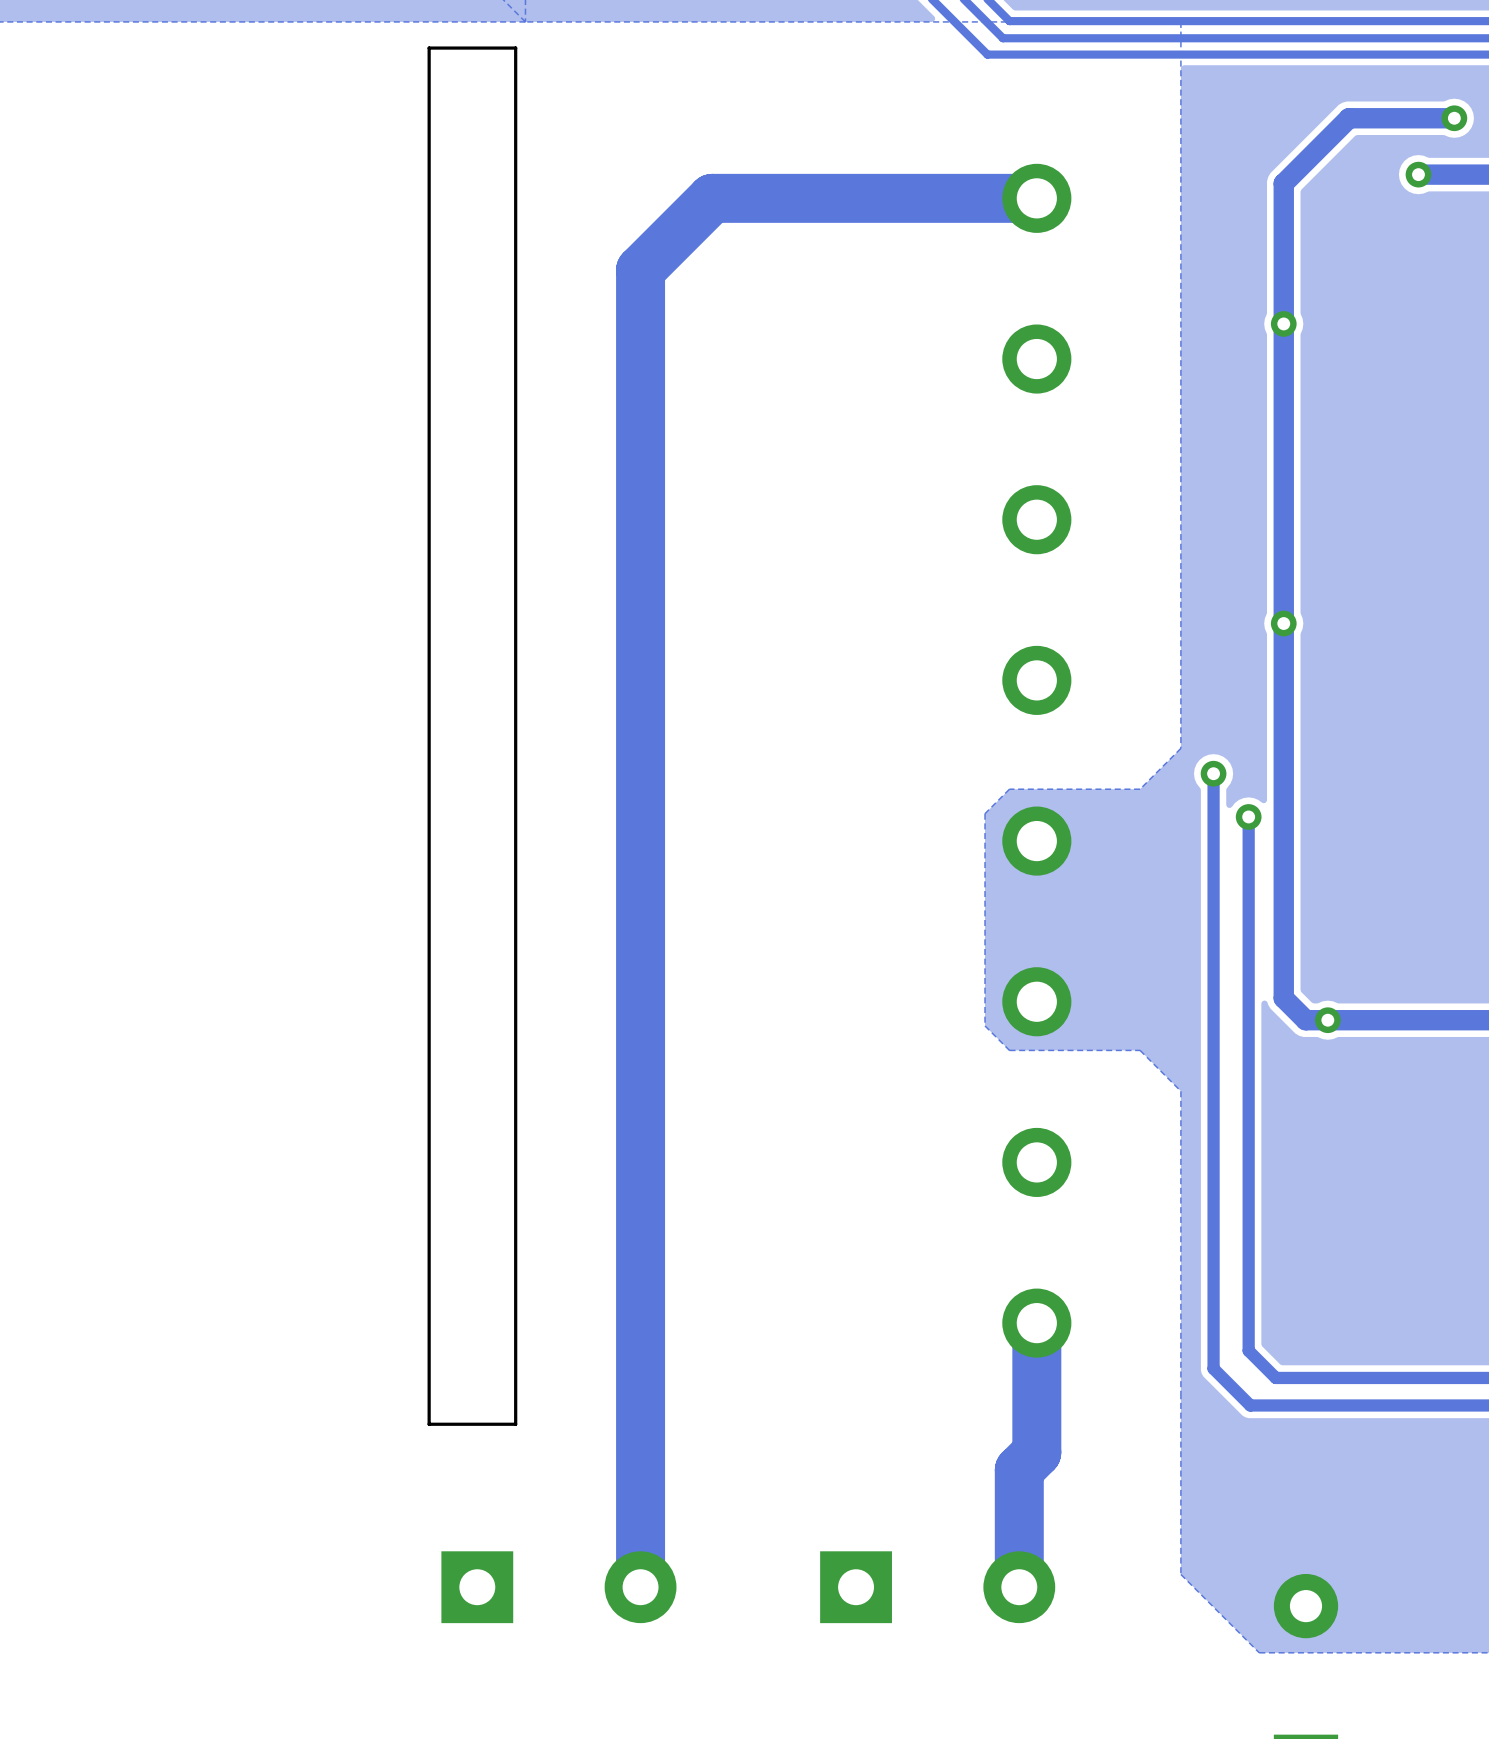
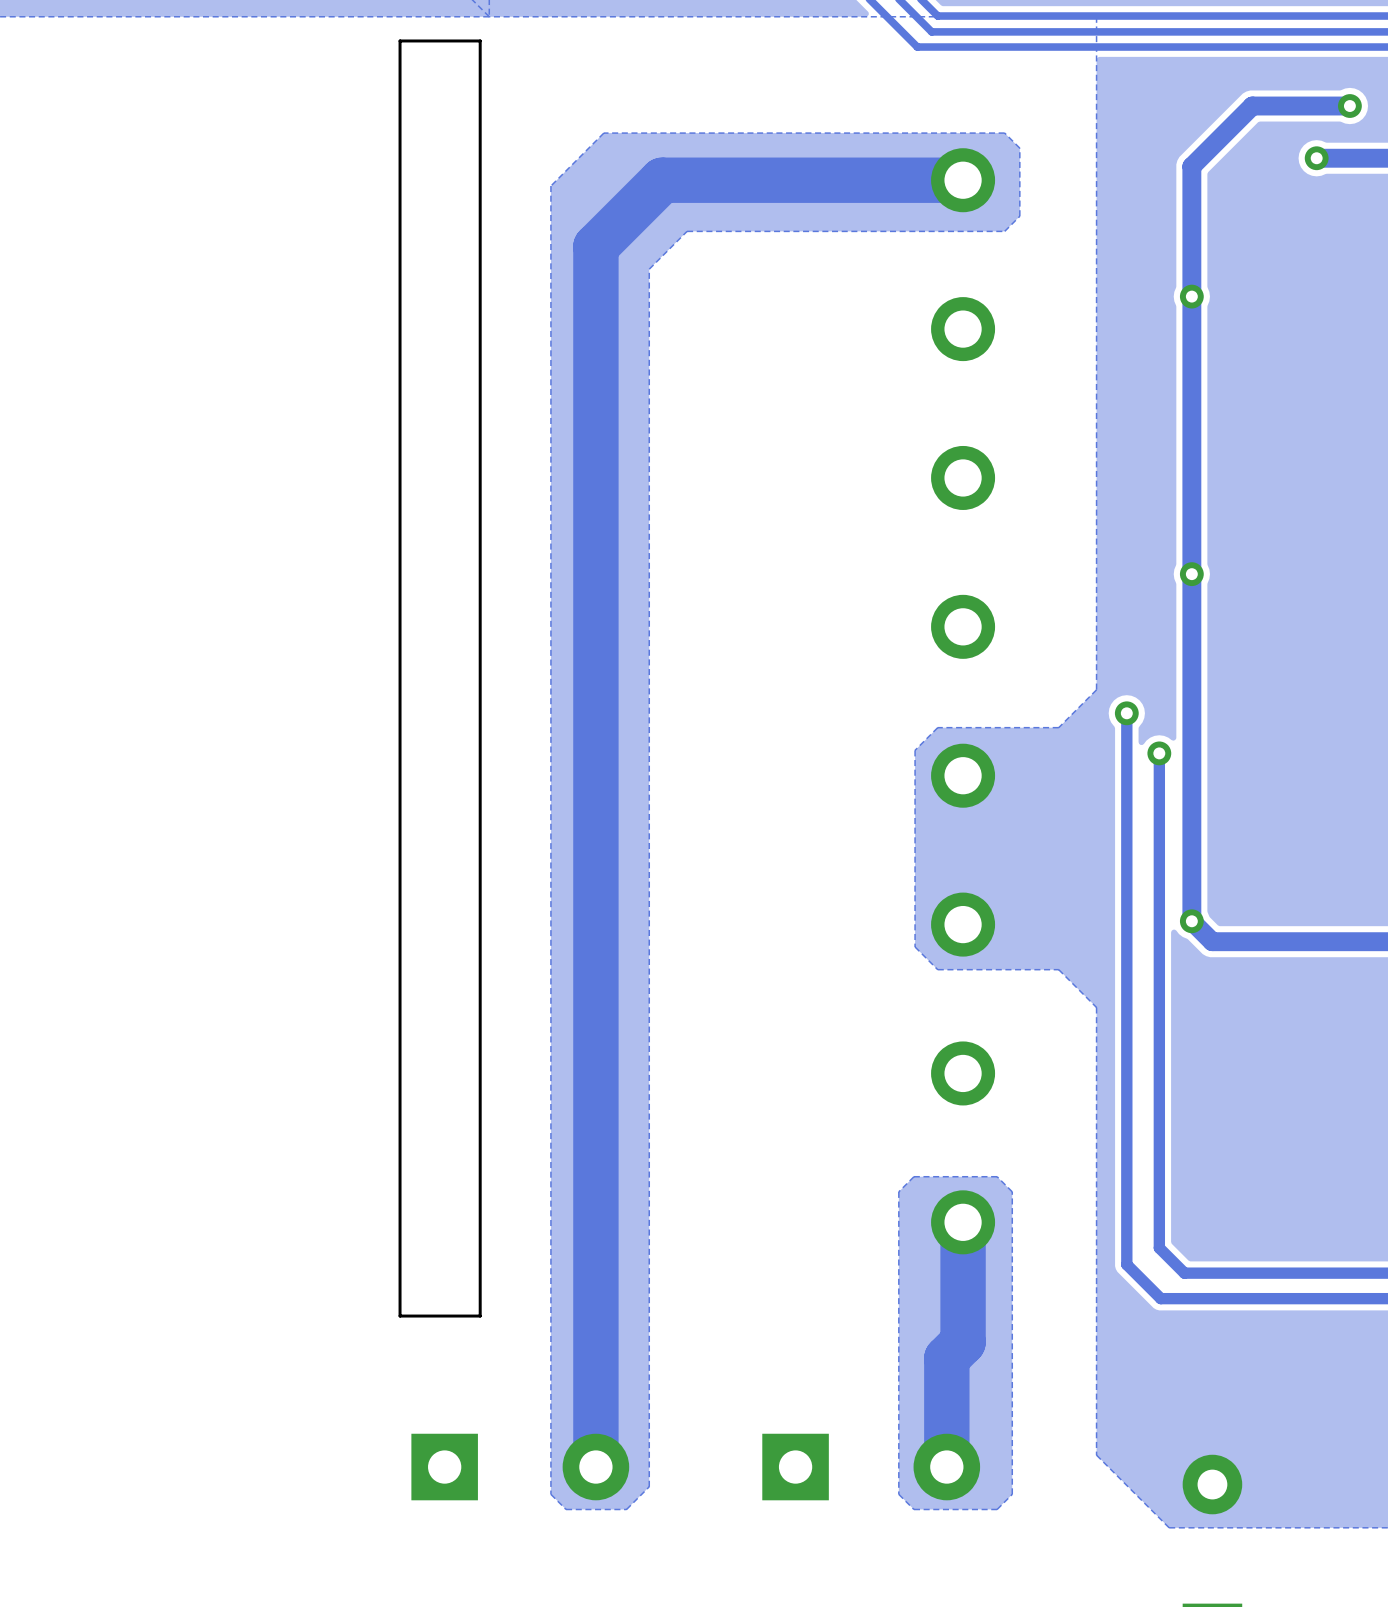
zone outline: none -> (1004, 133) (1019, 148) (1019, 216) (1004, 231) (687, 231) (649, 269) (649, 1486) (626, 1509) (566, 1509) (550, 1494) (550, 186) (603, 133) (1004, 133)
via position: (1327, 1020) -> (1191, 921)
zone outline: none -> (997, 1176) (1012, 1191) (1012, 1494) (997, 1509) (913, 1509) (898, 1494) (898, 1191) (913, 1176) (997, 1176)

